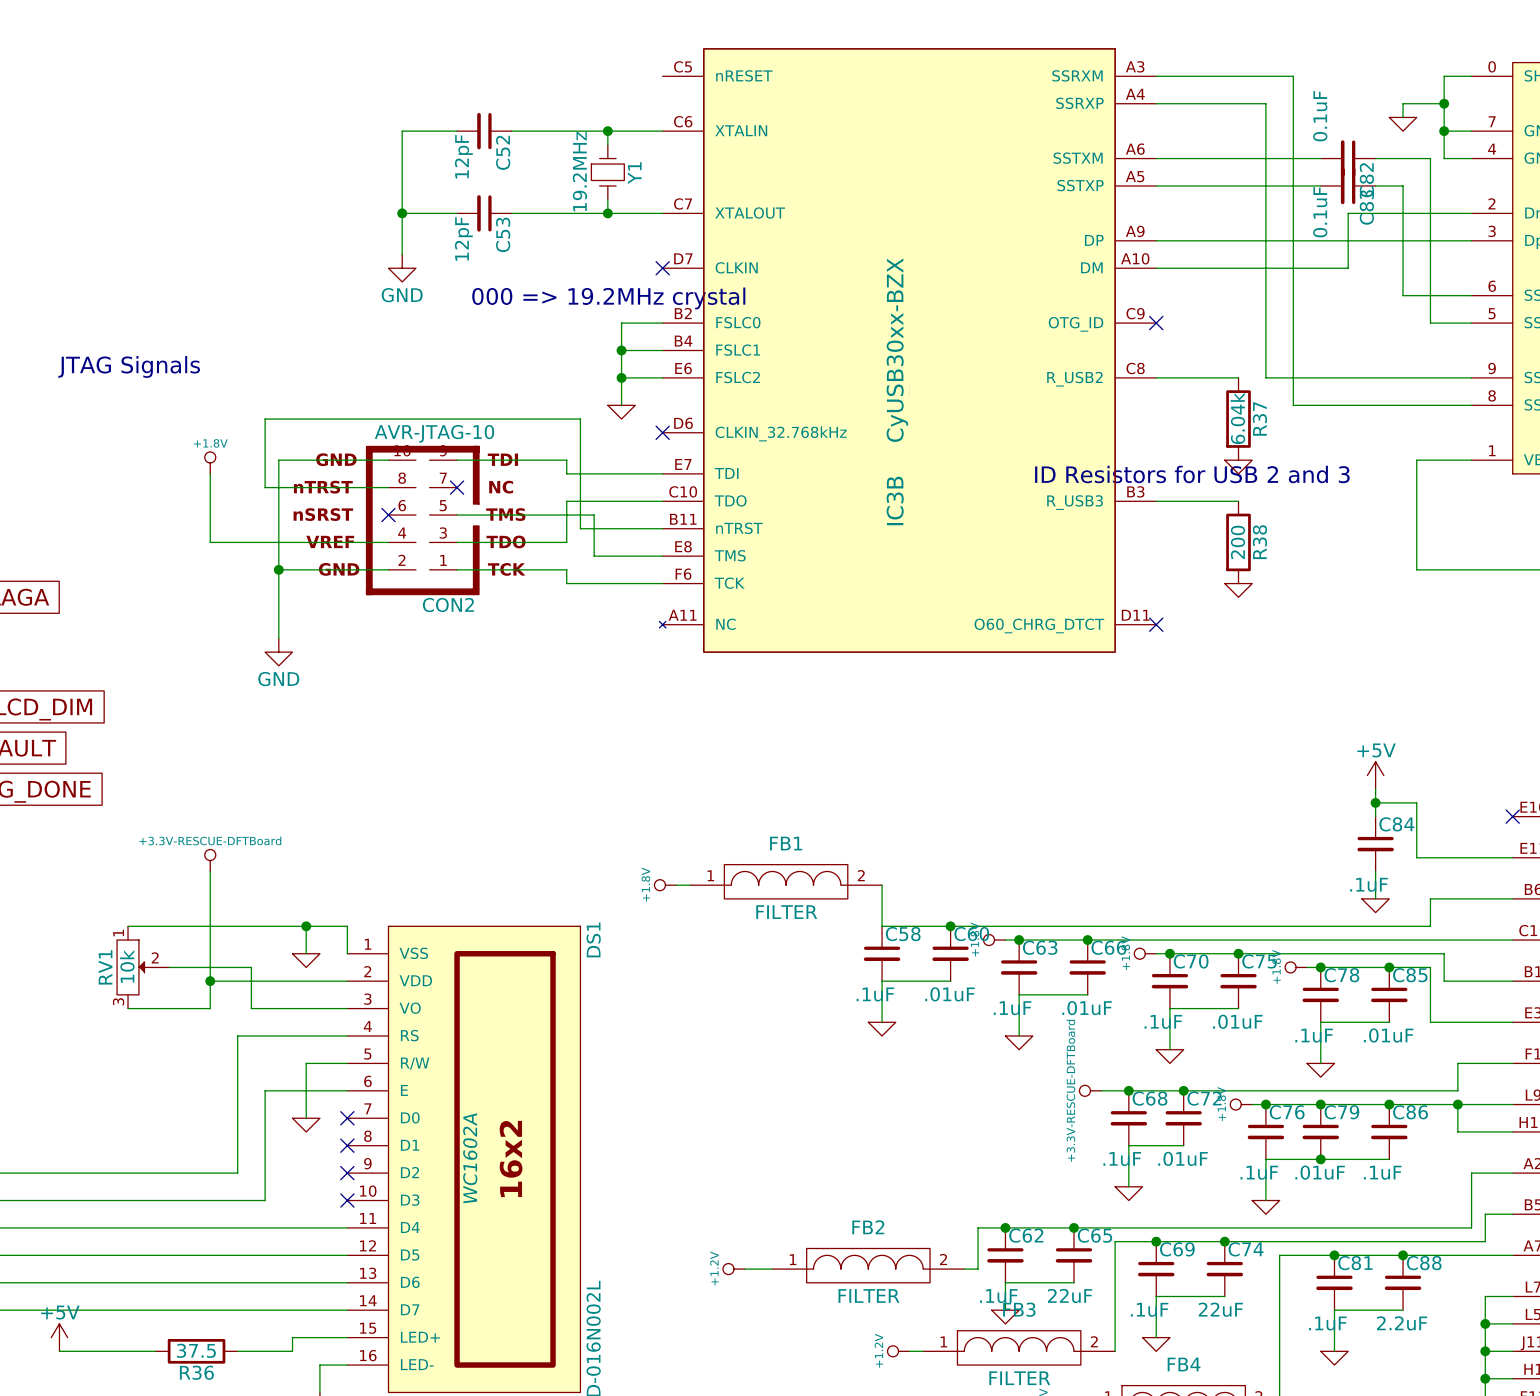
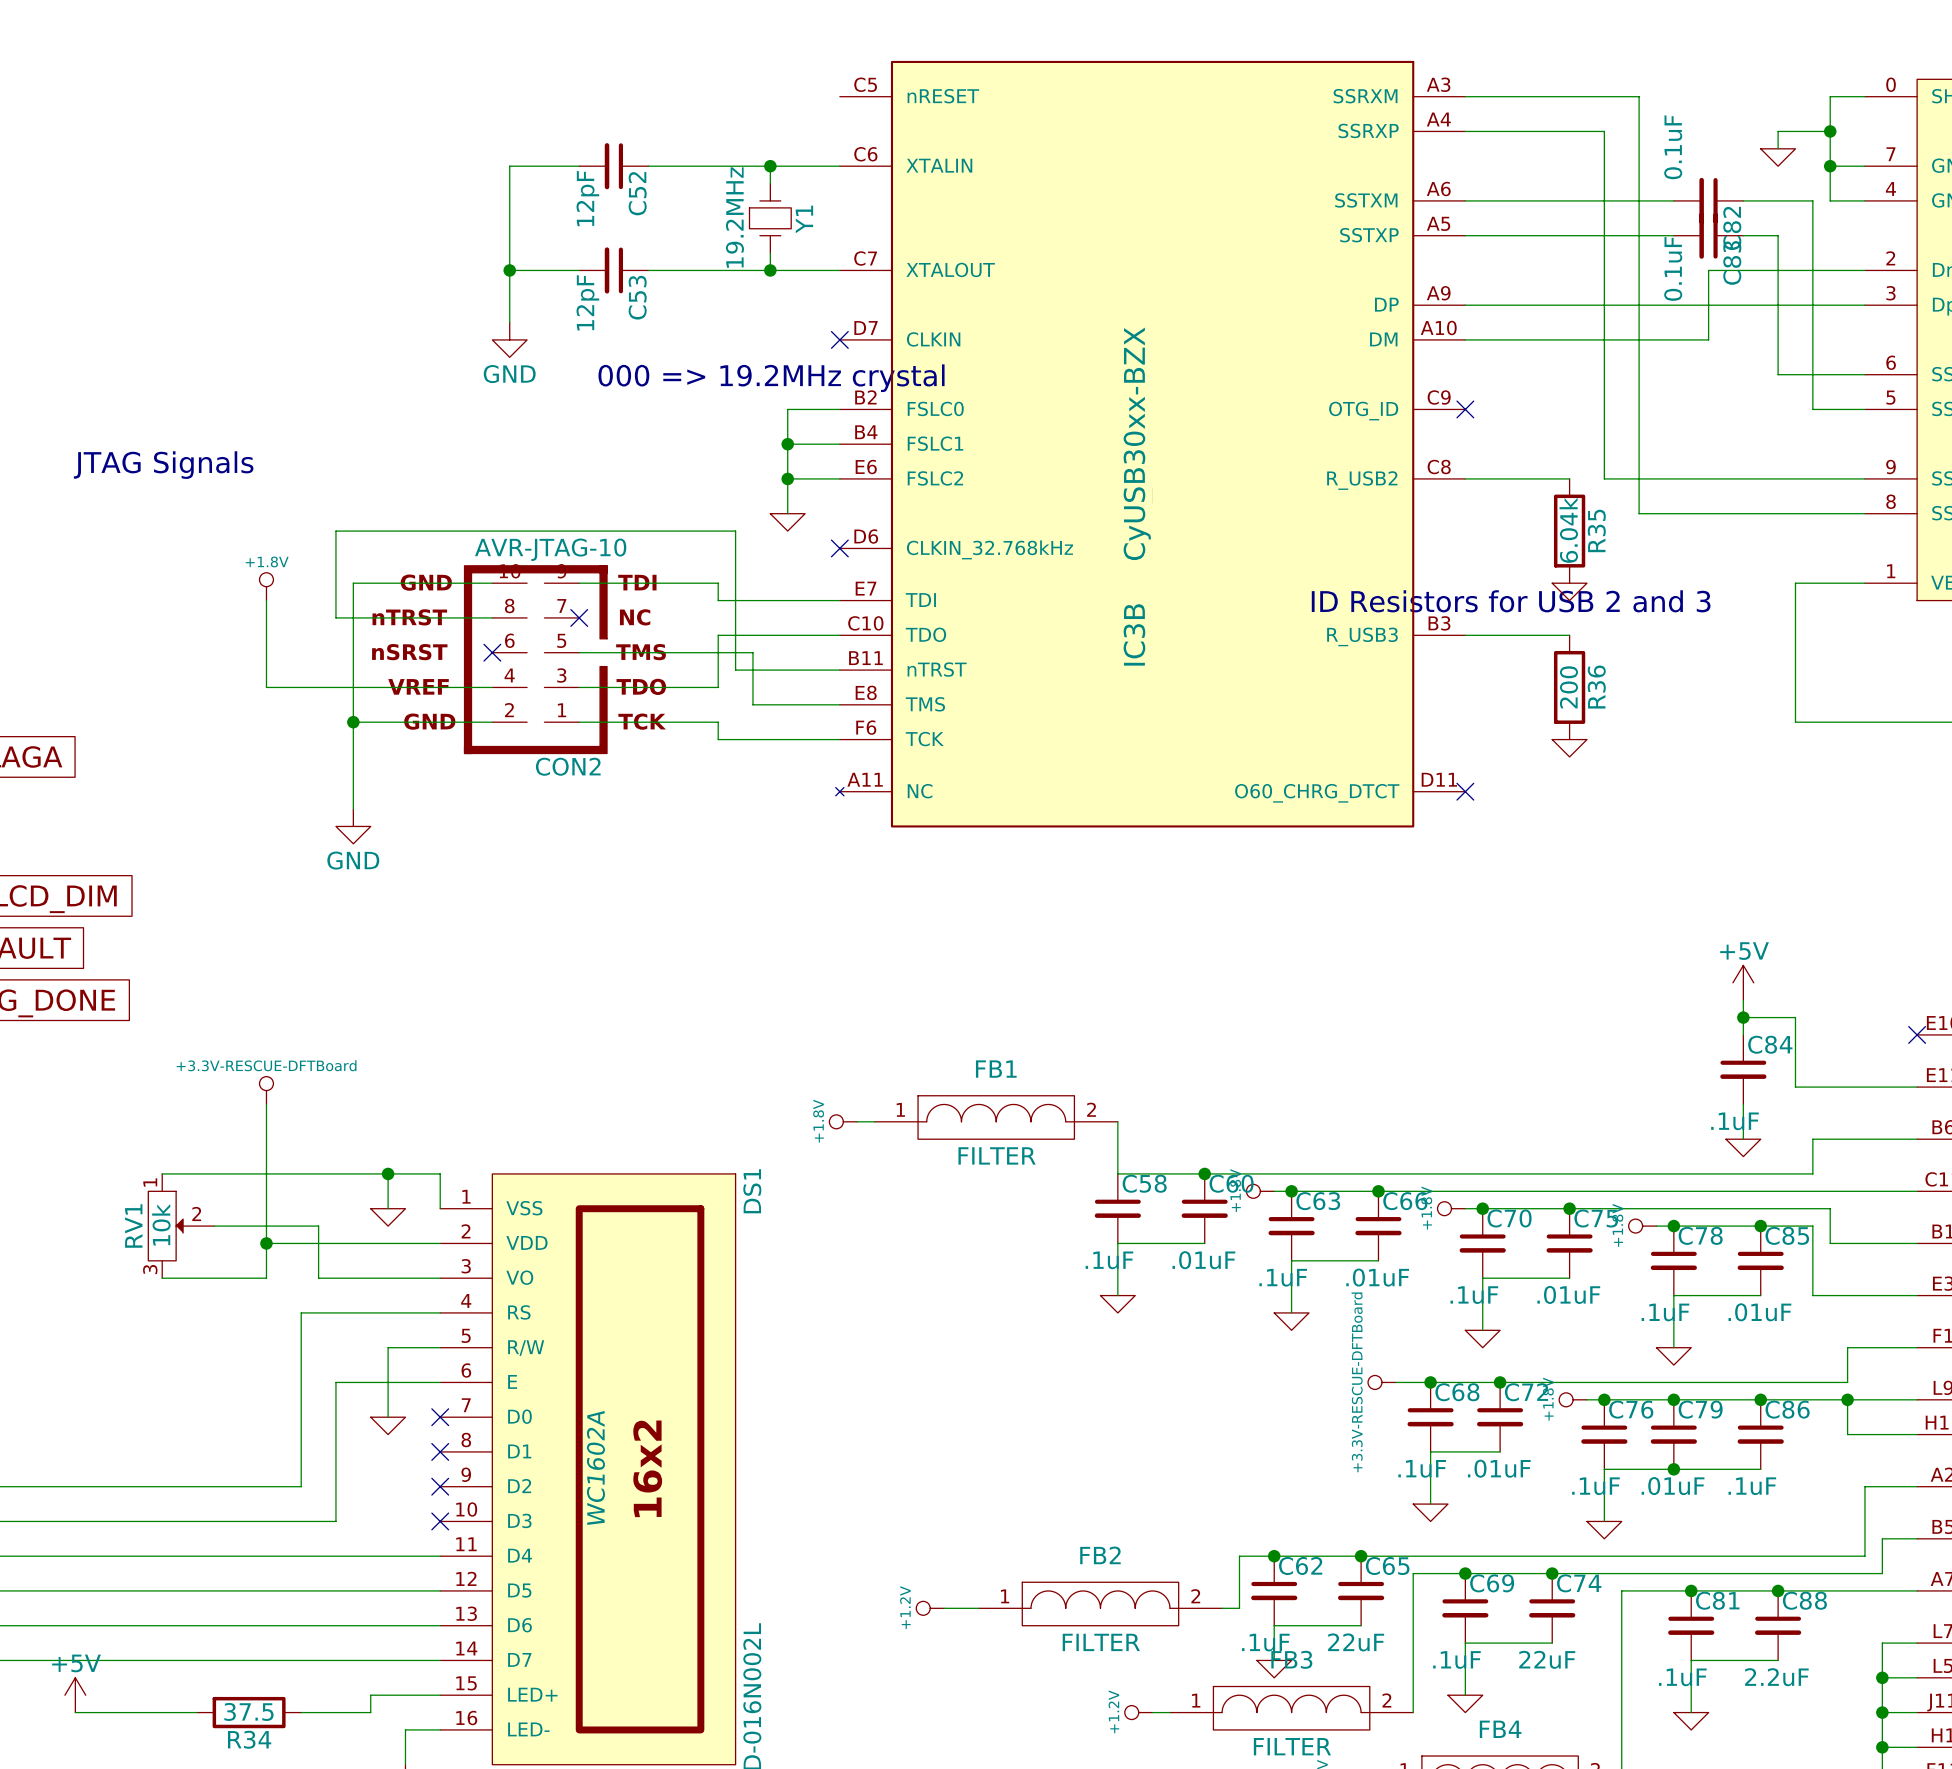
R37 name: R37 (1259, 418) -> R35 (1596, 530)
R38 name: R38 (1259, 542) -> R36 (1596, 687)
R36 name: R36 (196, 1372) -> R34 (249, 1739)

